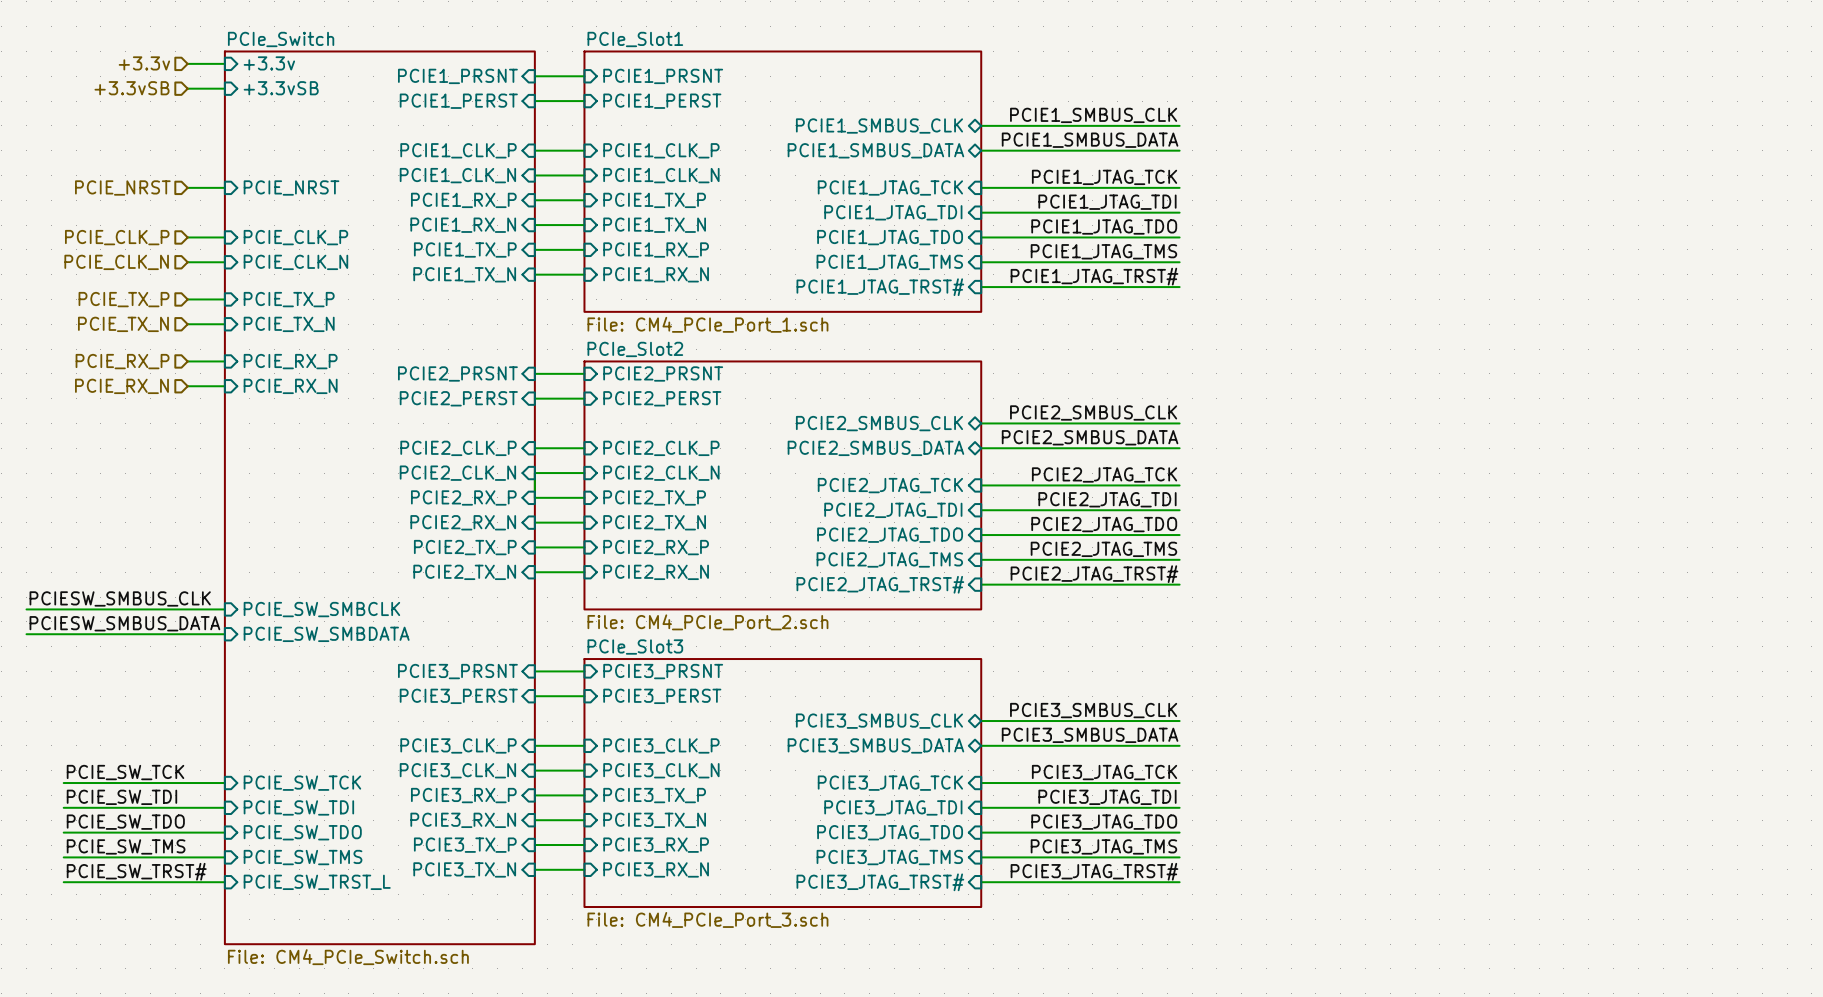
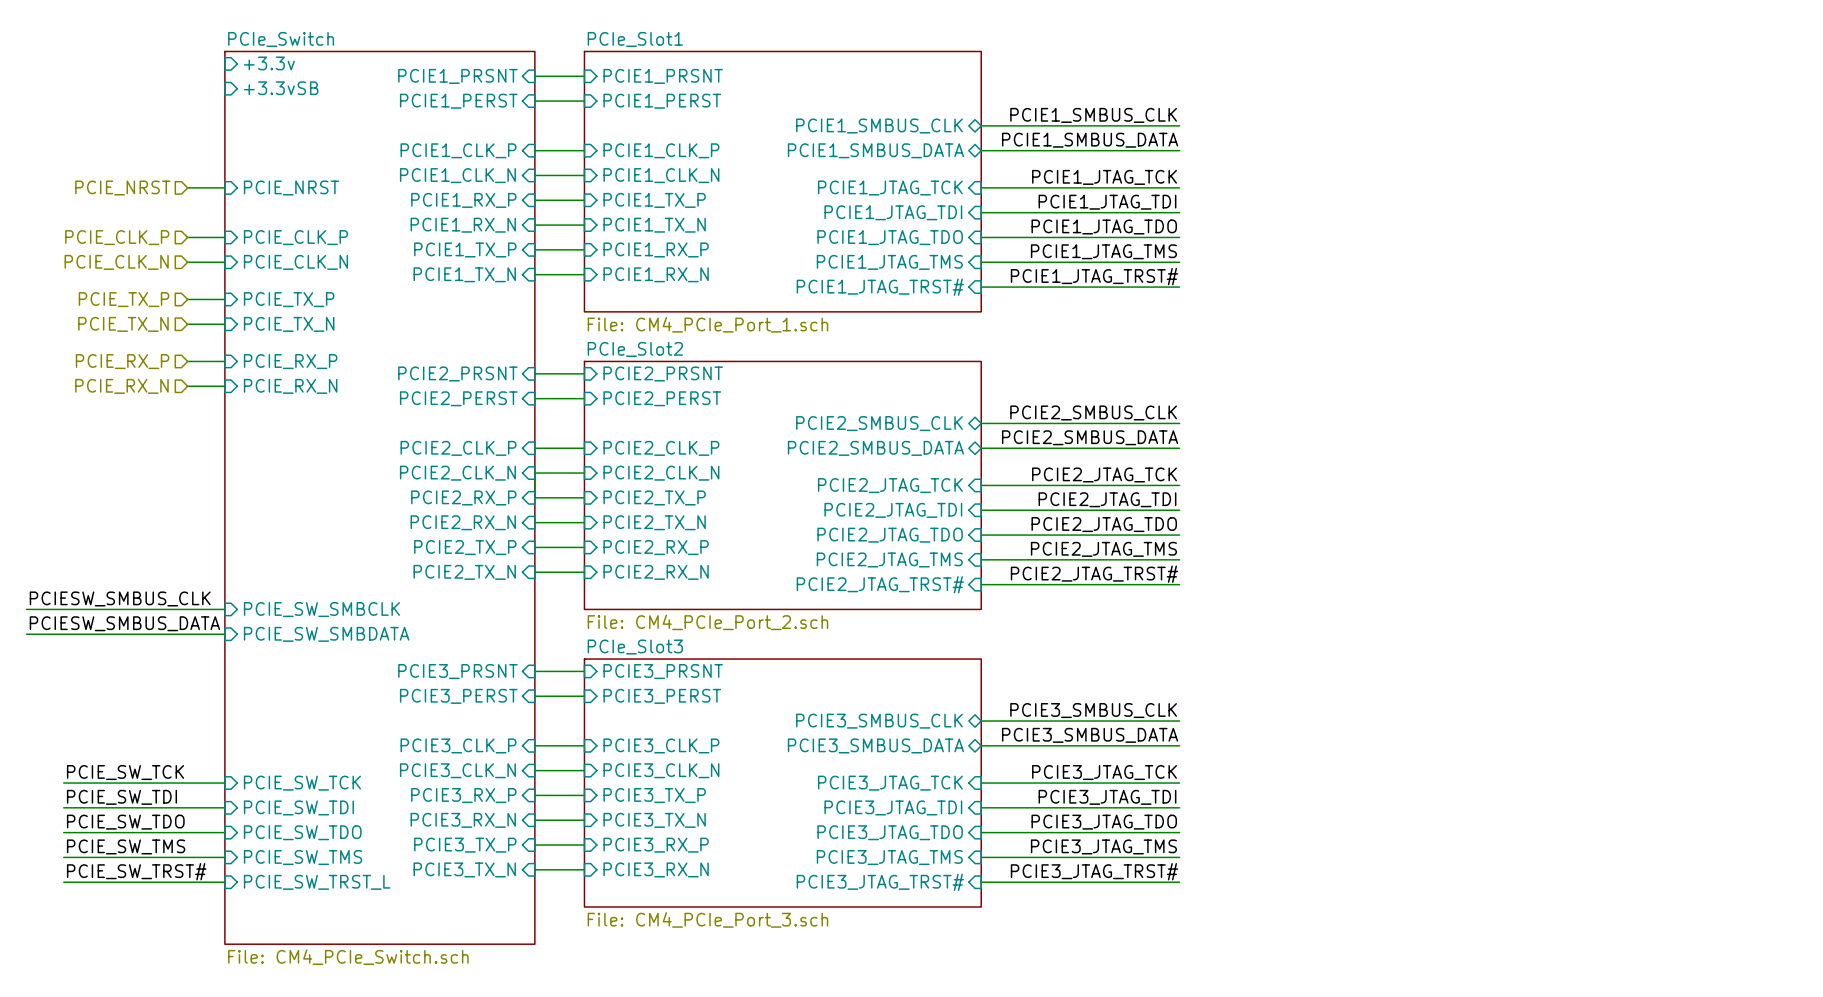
hierarchical label: +3.3v (144, 63) -> none
wire: (187, 63) (224, 63) -> none
hierarchical label: +3.3vSB (132, 88) -> none
wire: (187, 88) (224, 88) -> none

